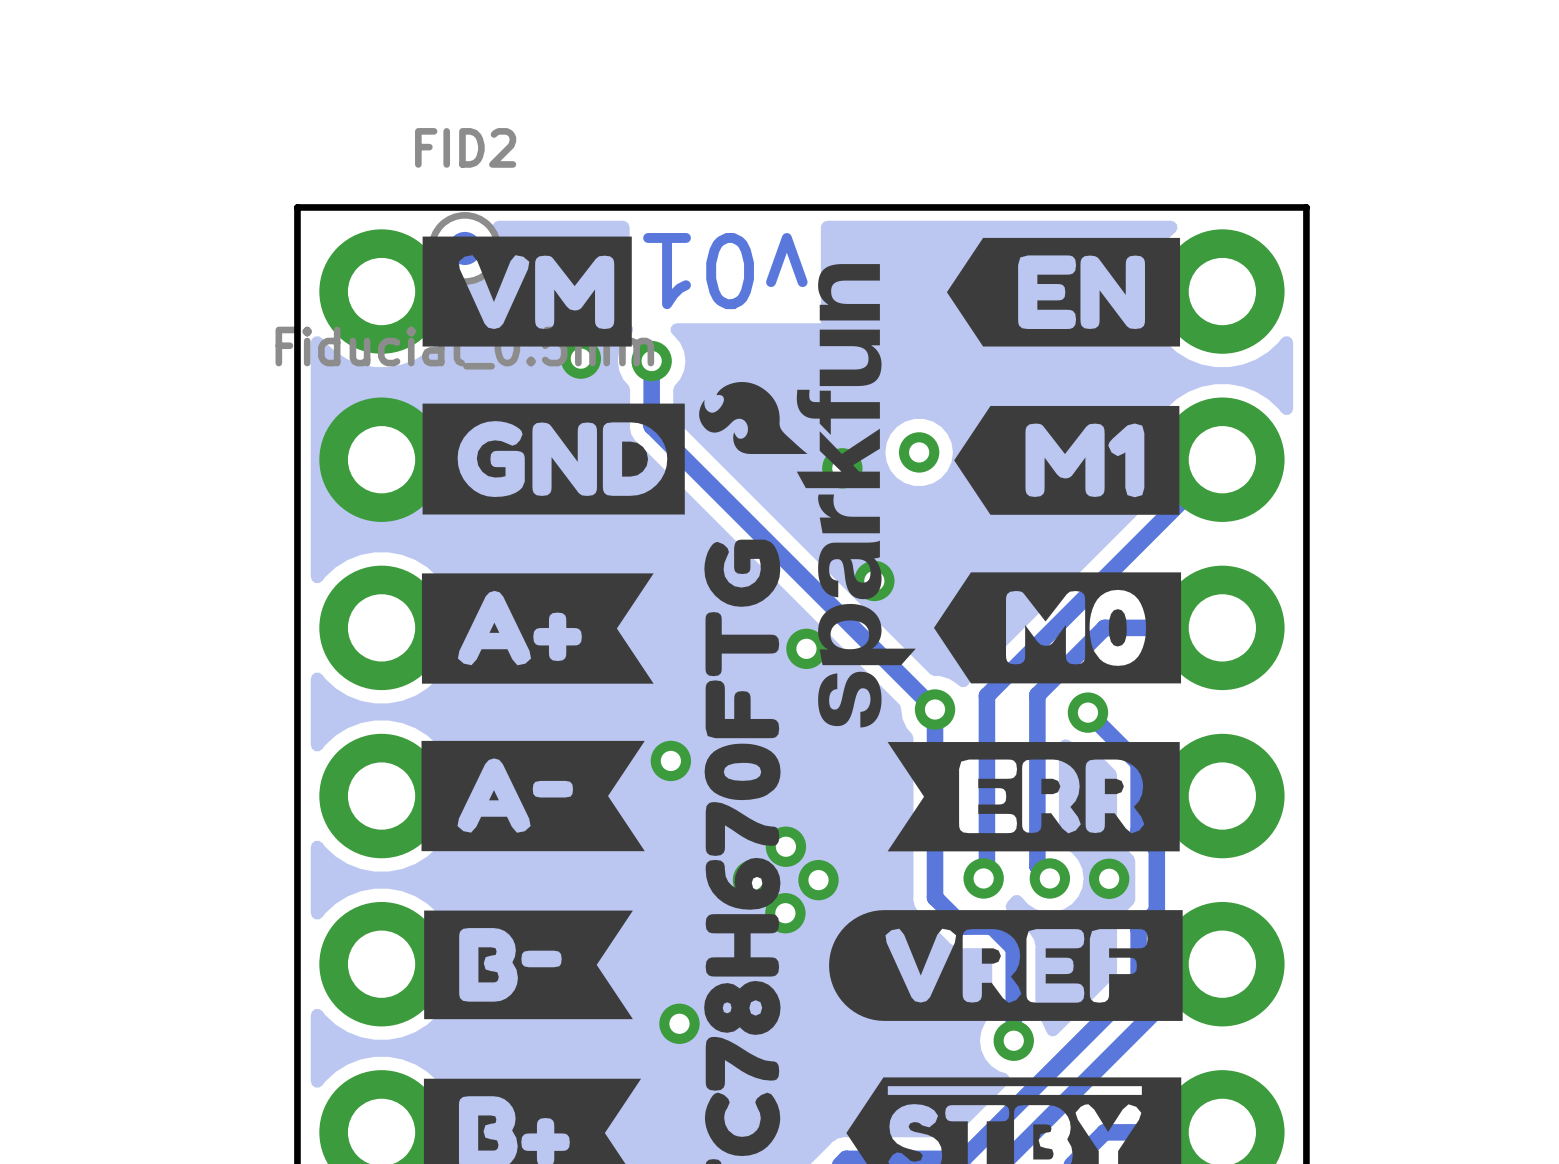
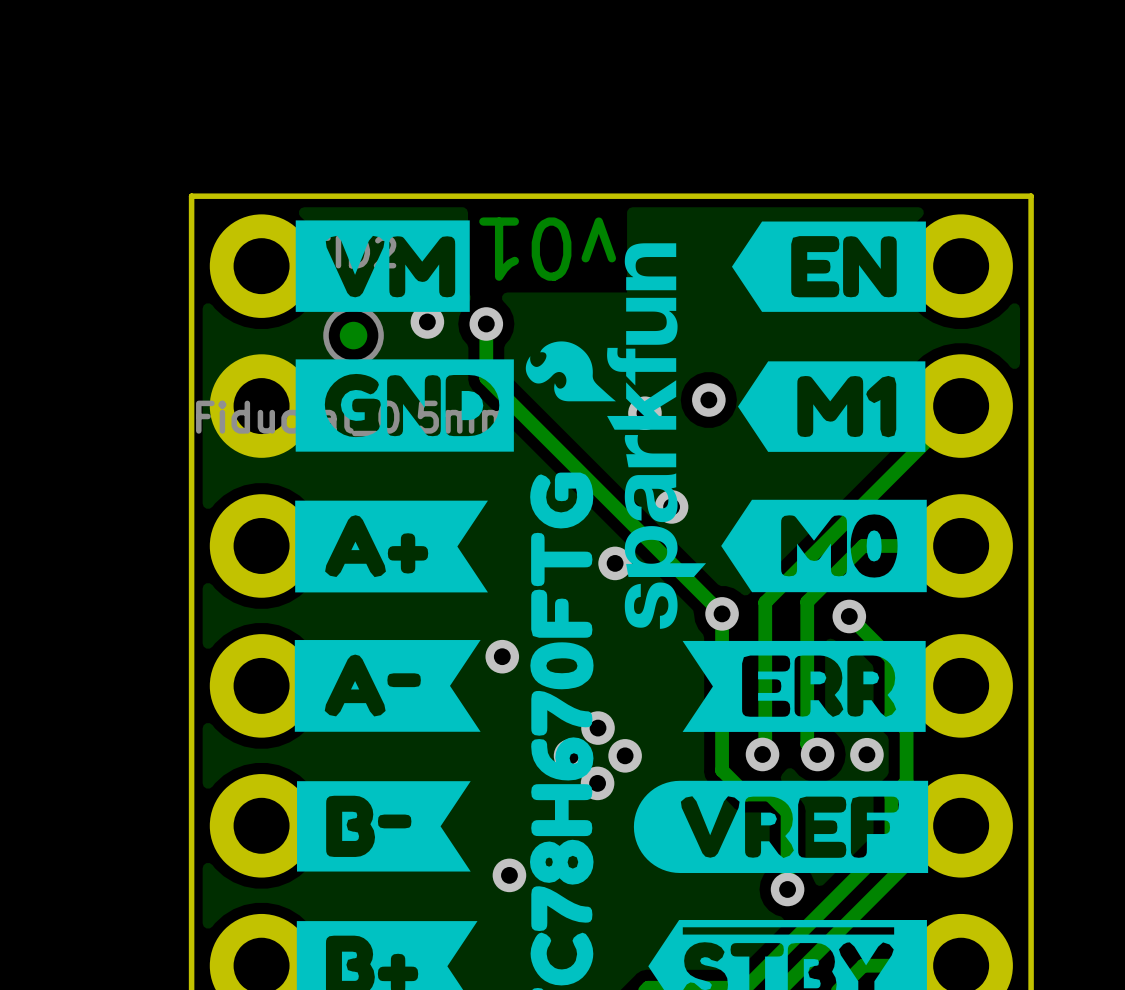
FID2 position: (464, 248) -> (353, 335)

